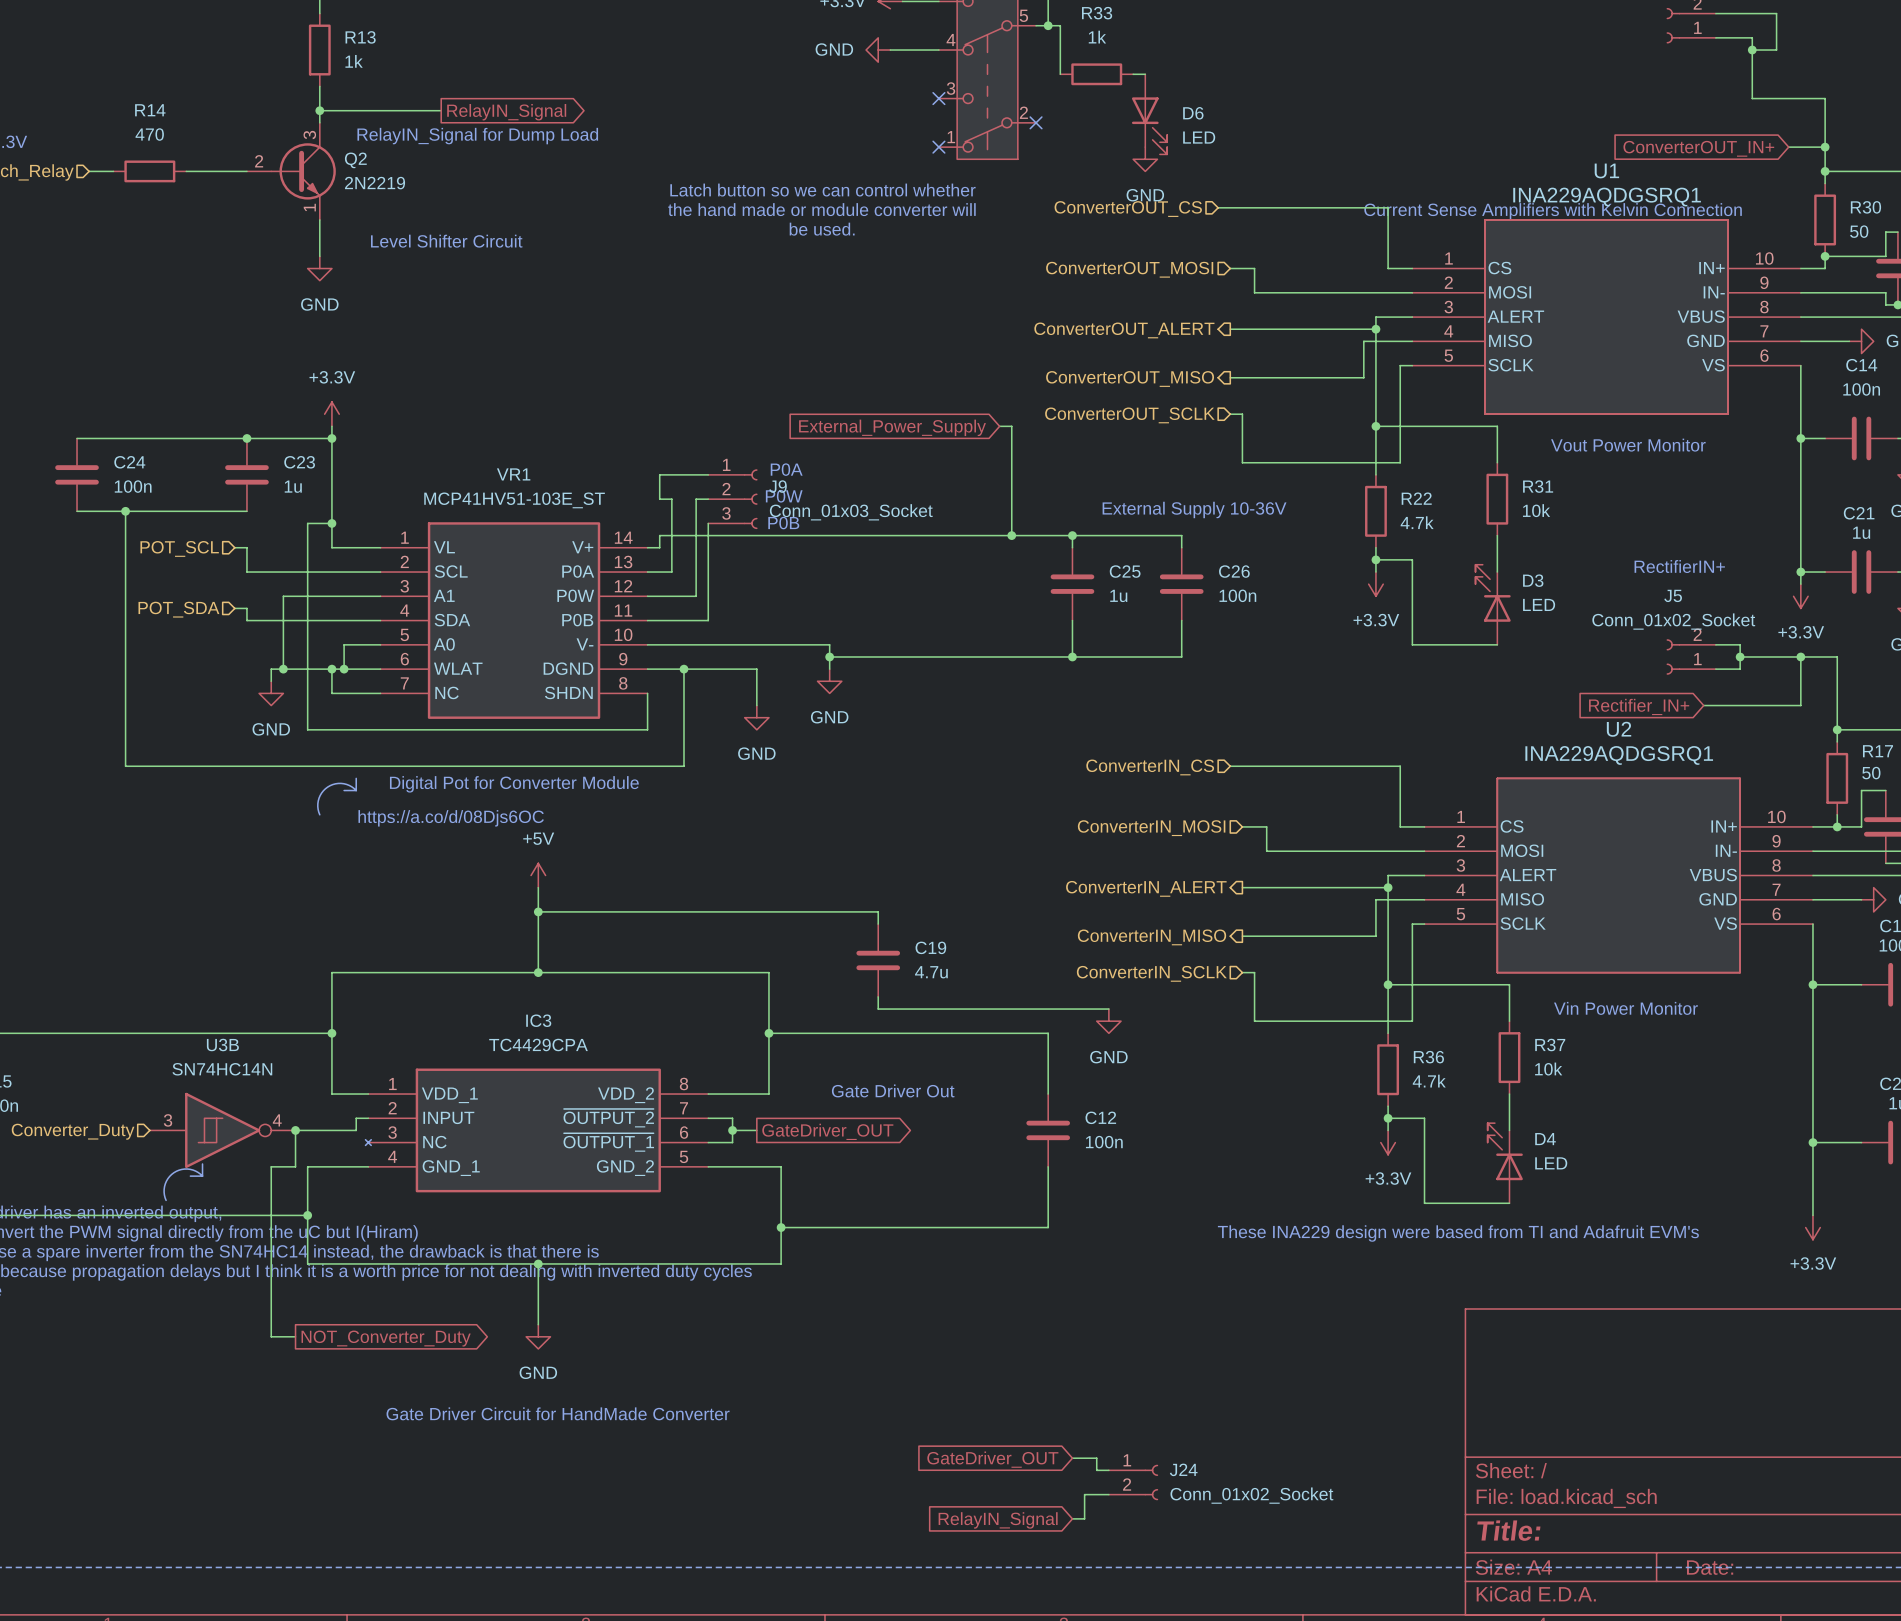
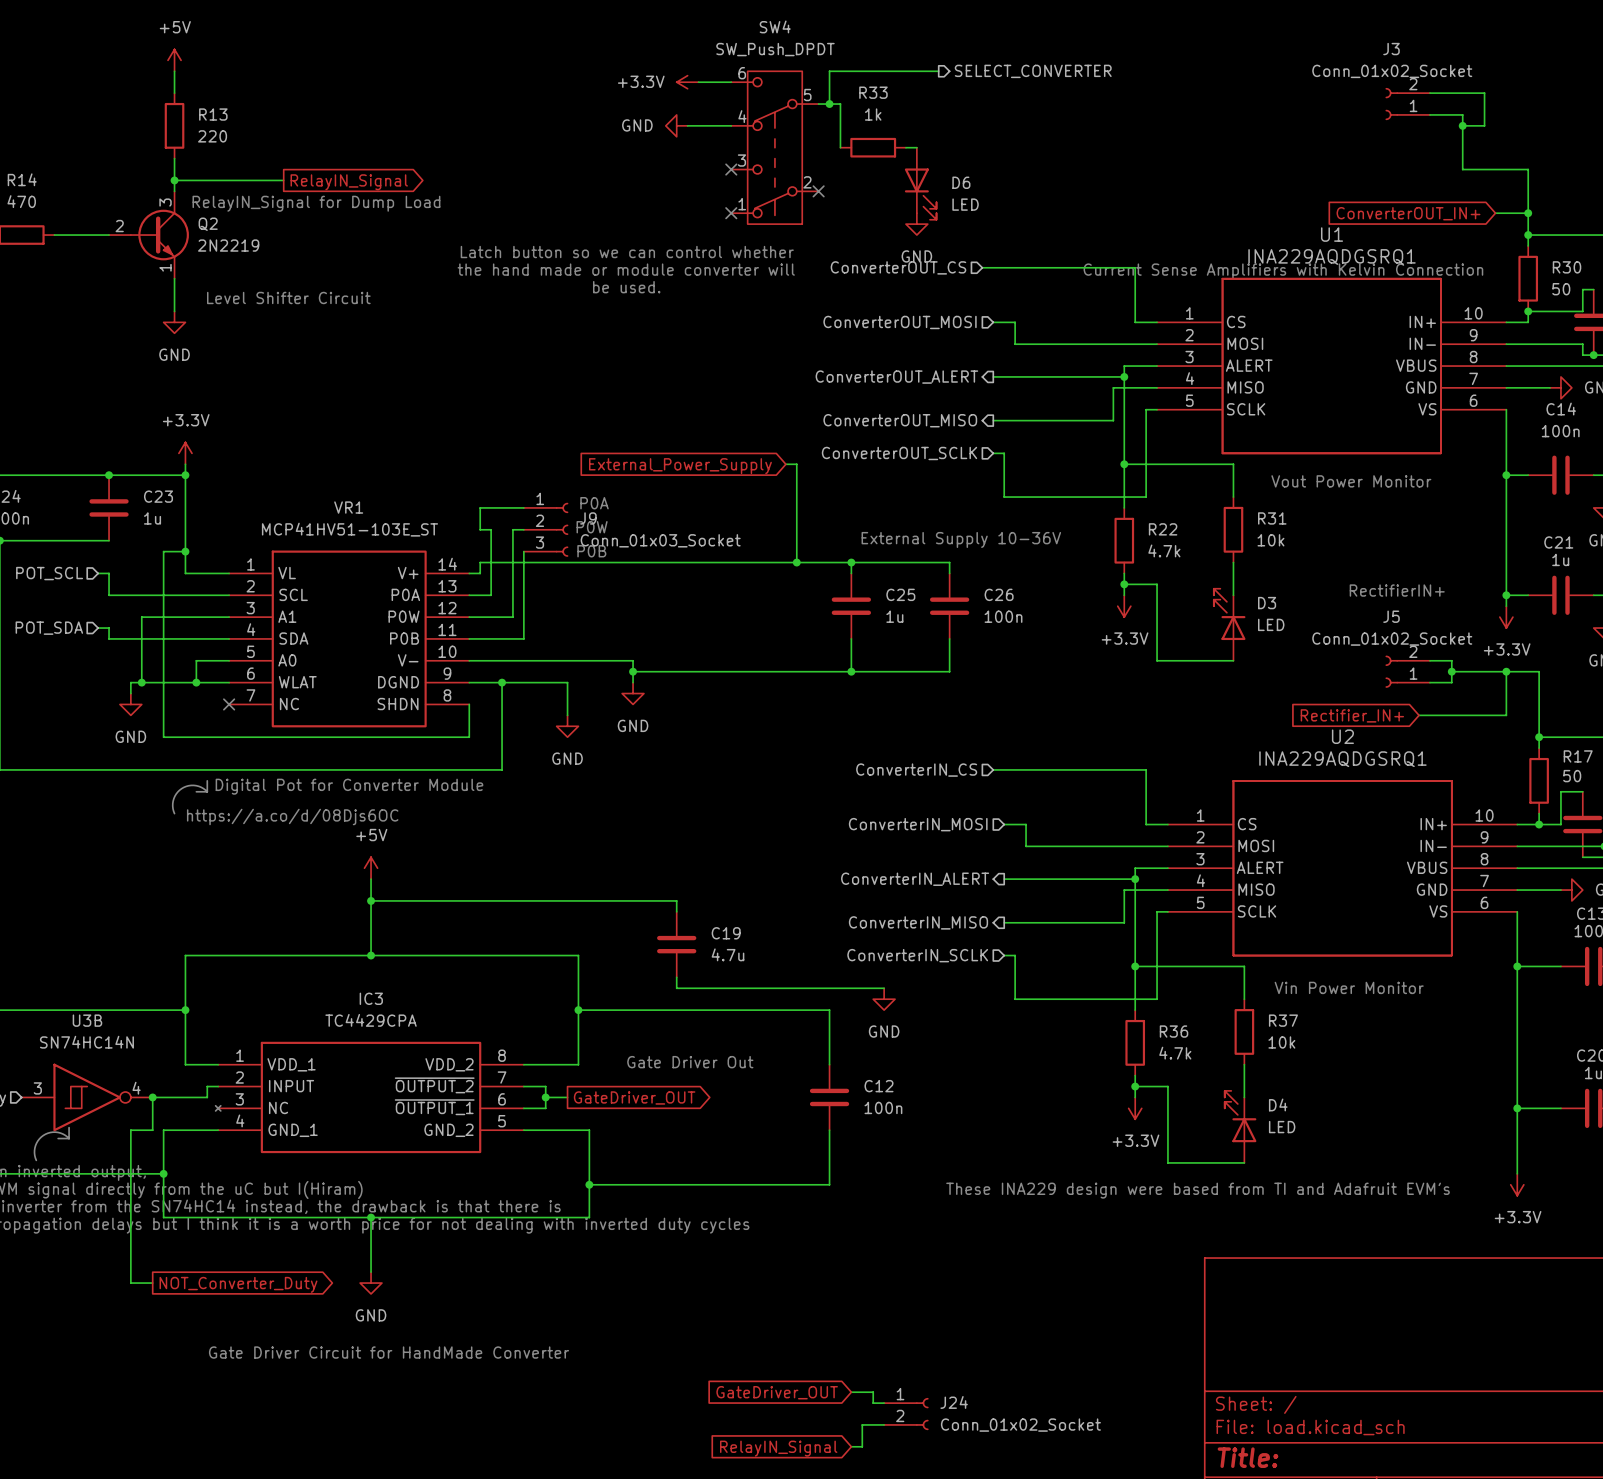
R13 value: 1k (354, 61) -> 220 (212, 136)
wire: (331, 669) (331, 693) (380, 693) -> none
junction: (331, 669) -> none
no-connect mark: none -> (229, 704)

